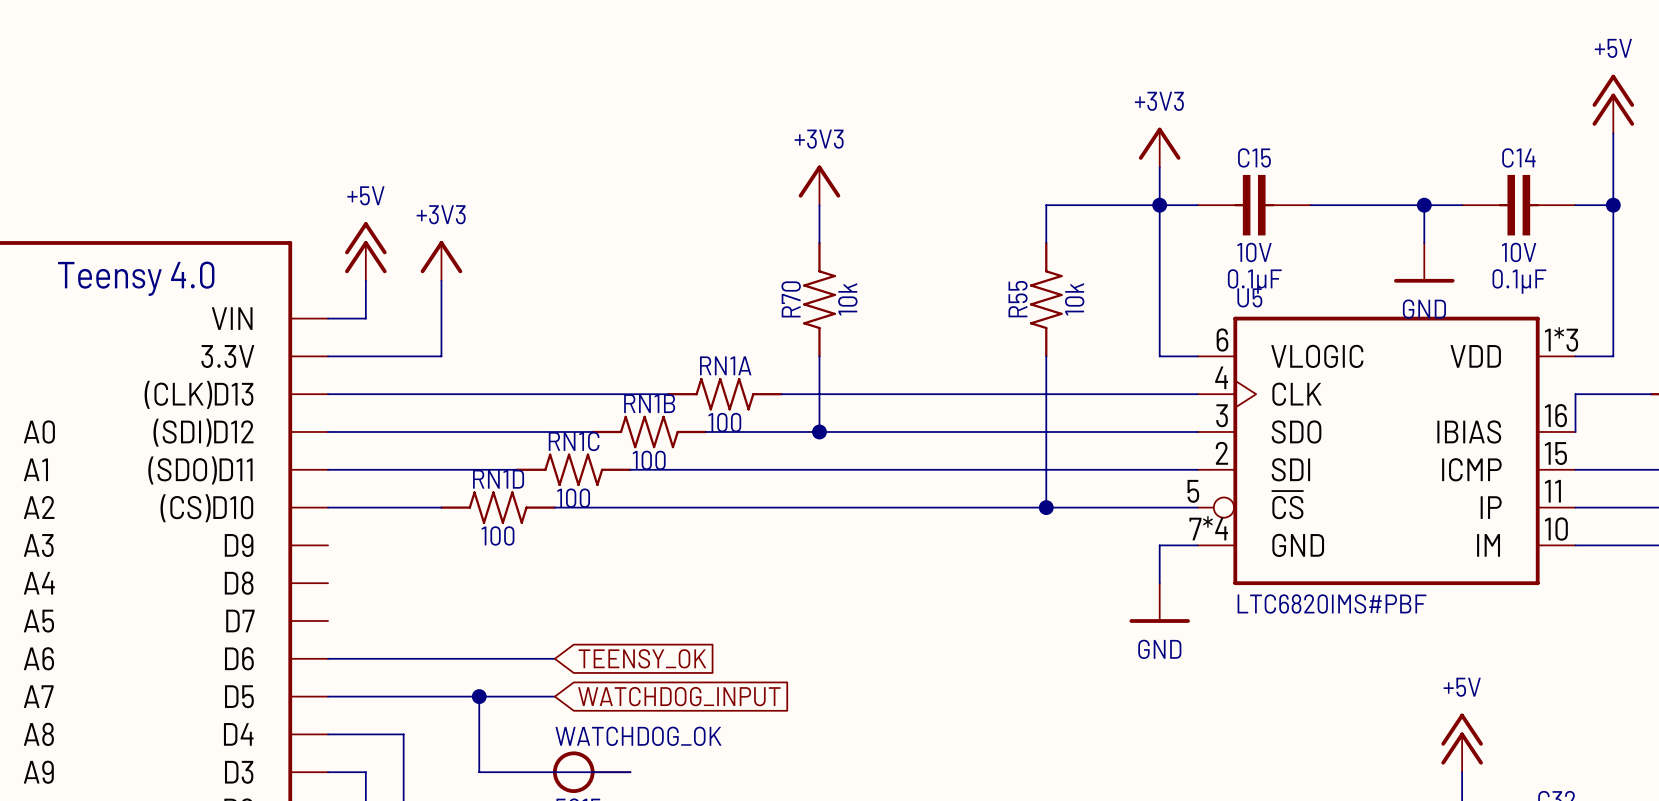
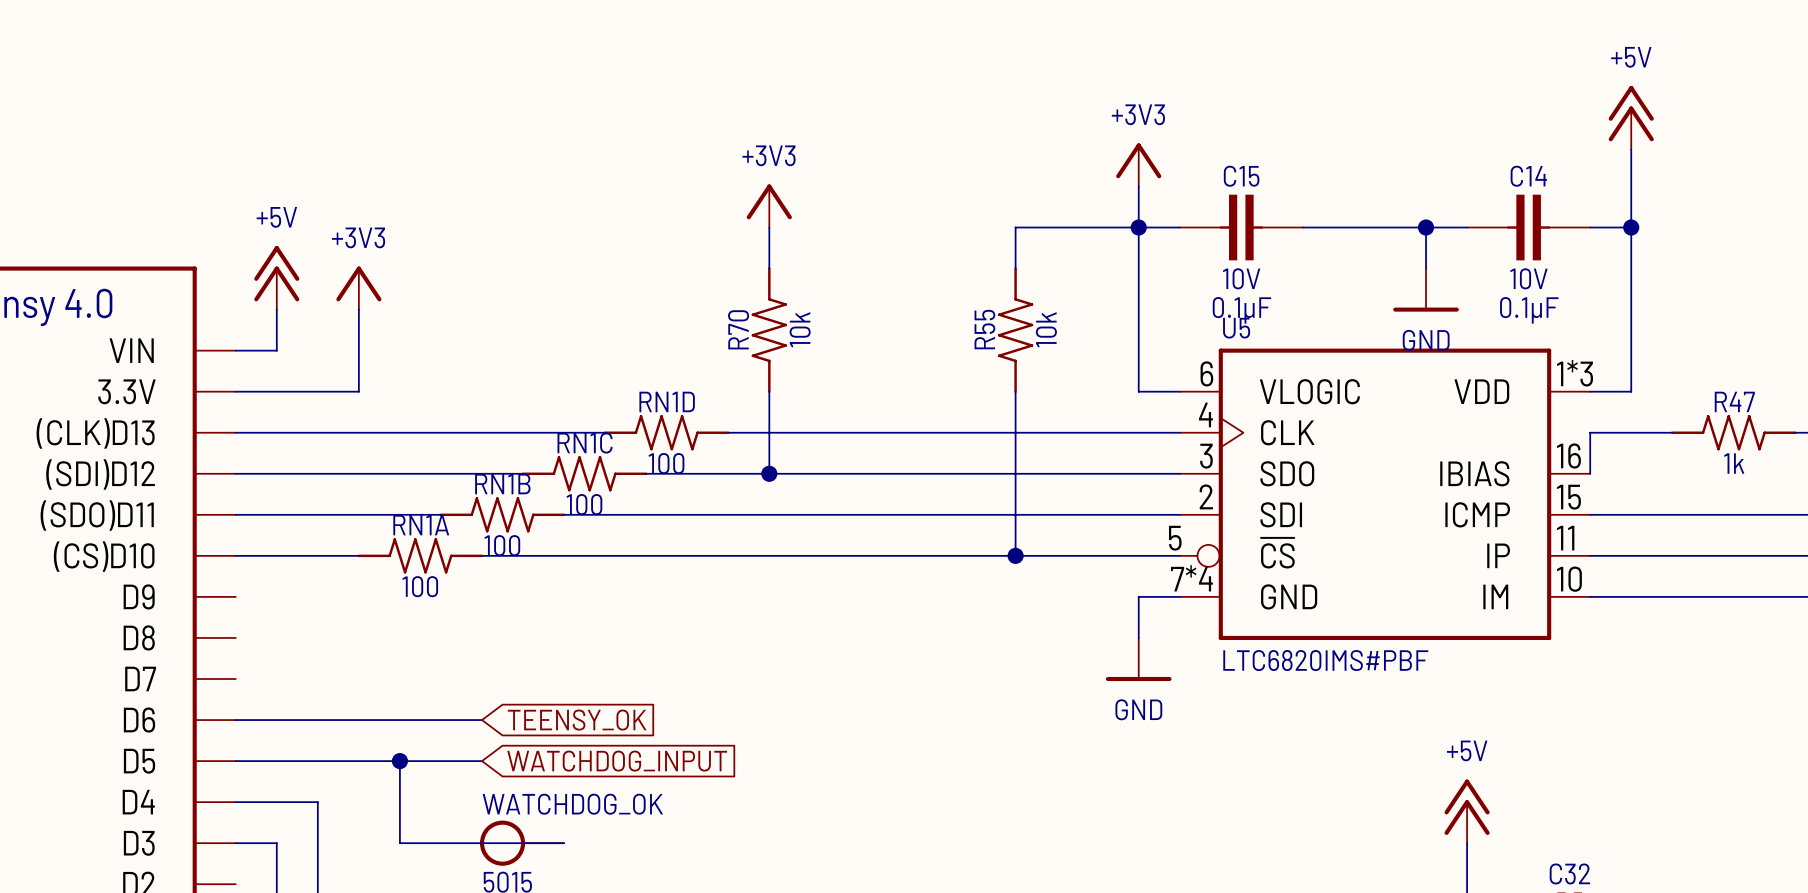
RN1A name: RN1A (725, 365) -> RN1D (667, 401)
RN1B name: RN1B (649, 403) -> RN1C (585, 443)
RN1C name: RN1C (574, 441) -> RN1B (502, 484)
RN1D name: RN1D (498, 479) -> RN1A (421, 525)

